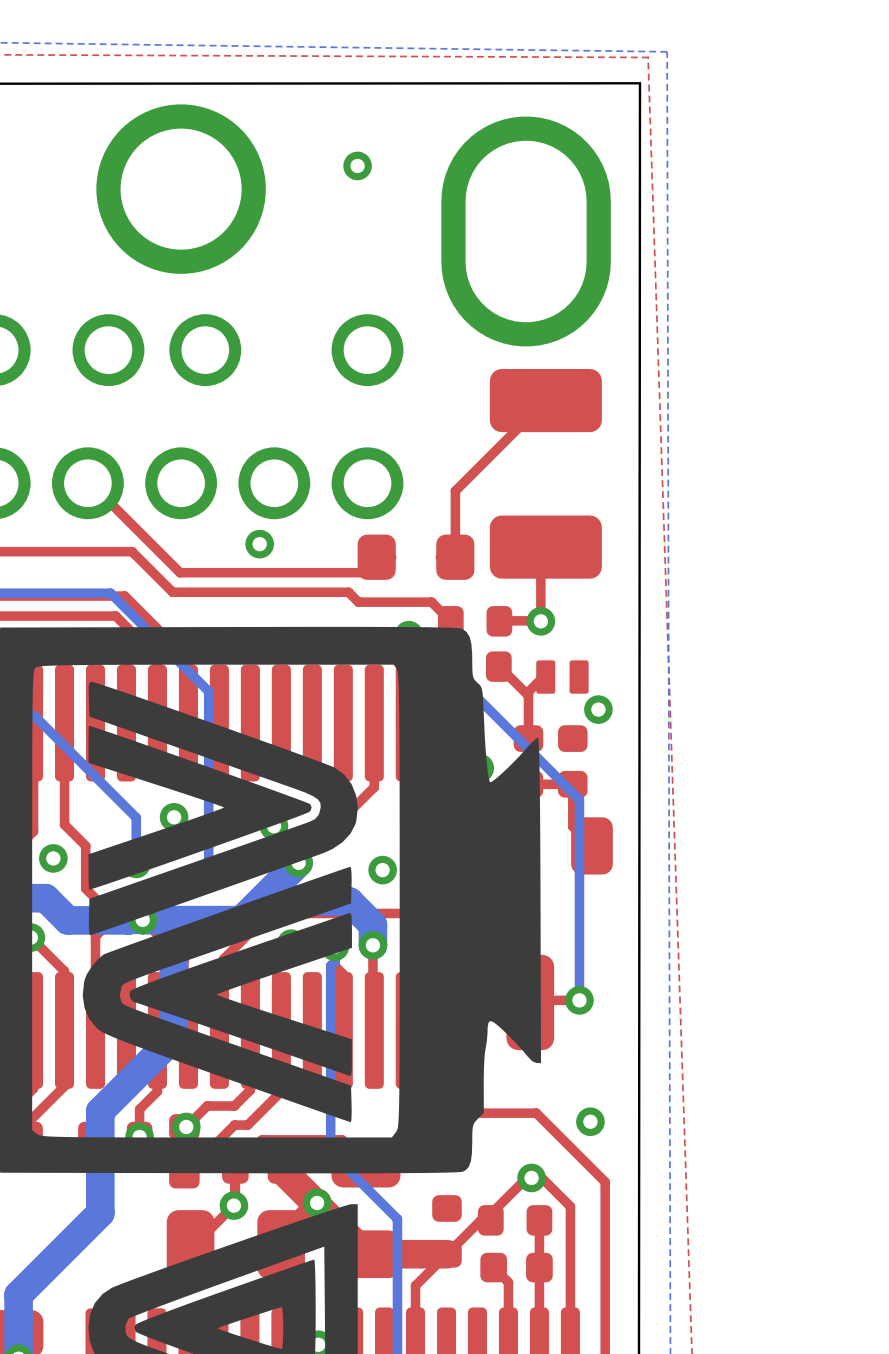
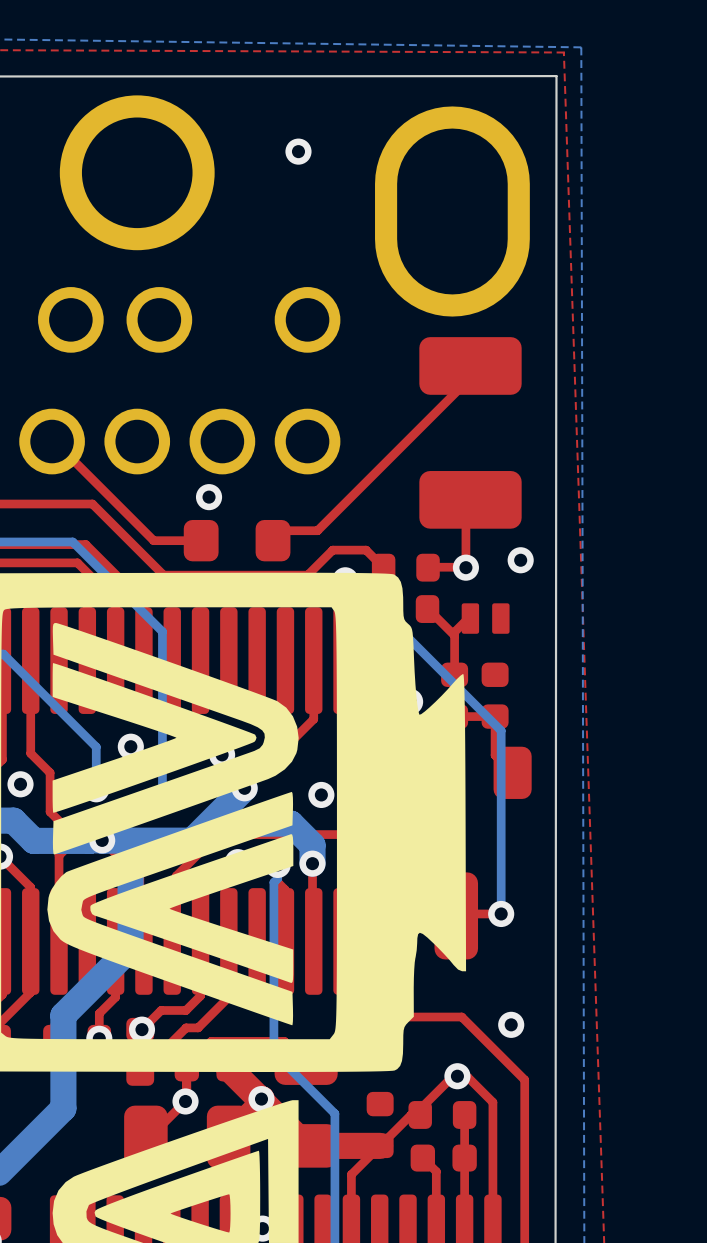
top track: (545, 400) (455, 491) (455, 542) (440, 557) -> (470, 365) (470, 377) (317, 530) (282, 530) (273, 540)
top track: (391, 557) (376, 572) (180, 572) -> (201, 540) (153, 540) (136, 523)
part position: (416, 557) -> (237, 540)
top track: (172, 592) (348, 592) (358, 602) (395, 602) -> (129, 541) (163, 575) (307, 575) (332, 550)
via position: (598, 709) -> (520, 560)

